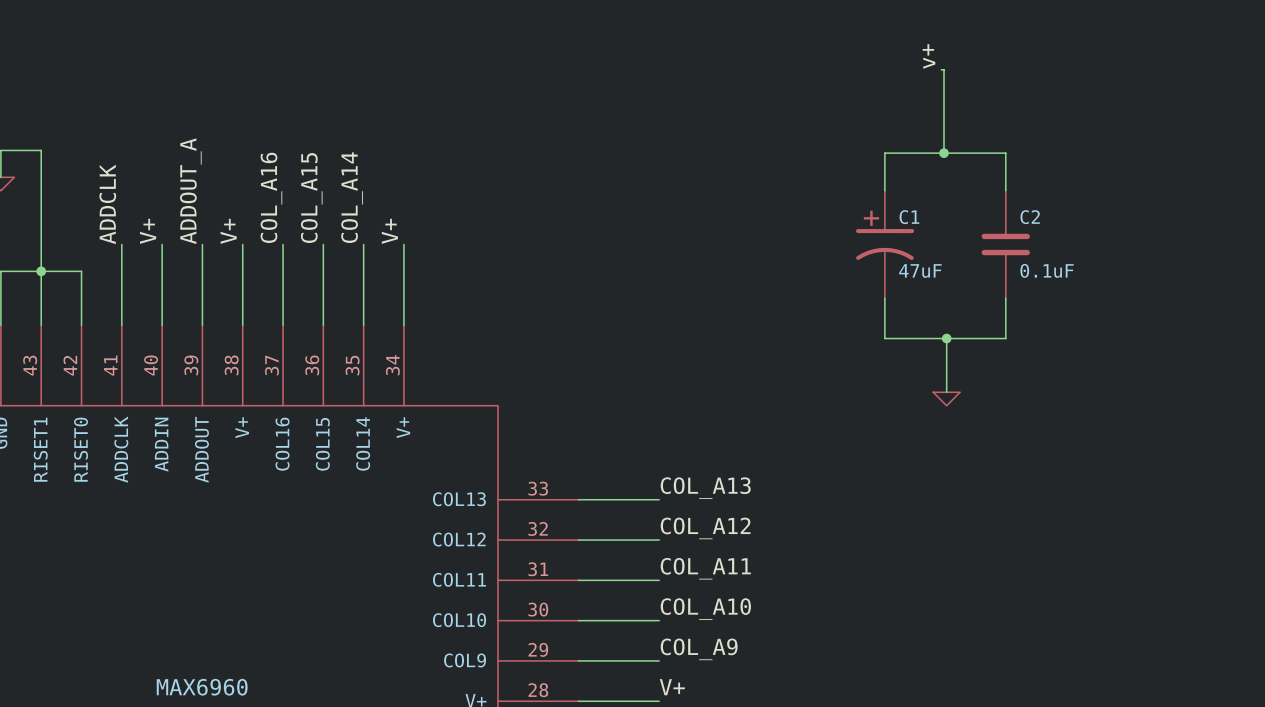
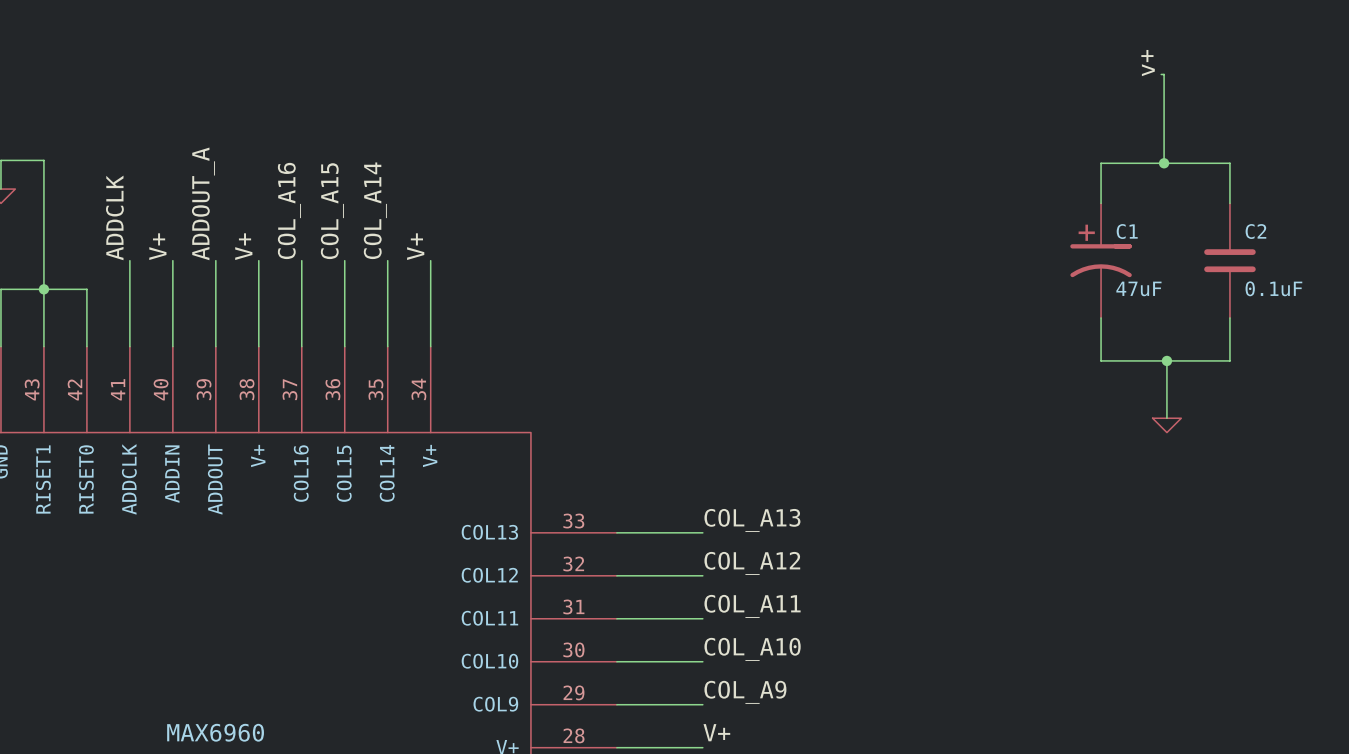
label position: v+ (928, 56) -> v+ (1148, 63)
wire: (941, 69) (944, 69) (944, 153) -> (1161, 74) (1164, 74) (1164, 163)
junction: (944, 153) -> none
junction: none -> (1164, 163)
wire: (884, 190) (884, 153) (1005, 153) (1005, 190) -> (1101, 203) (1101, 163) (1229, 163) (1229, 203)
C1 position: (884, 244) -> (1101, 260)
C2 position: (1005, 244) -> (1229, 260)
wire: (884, 298) (884, 338) (1005, 338) (1005, 298) -> (1101, 317) (1101, 360) (1229, 360) (1229, 317)
wire: (946, 338) (946, 392) -> (1166, 360) (1166, 418)
junction: (946, 338) -> none
junction: none -> (1166, 360)
power symbol position: (946, 398) -> (1166, 425)

